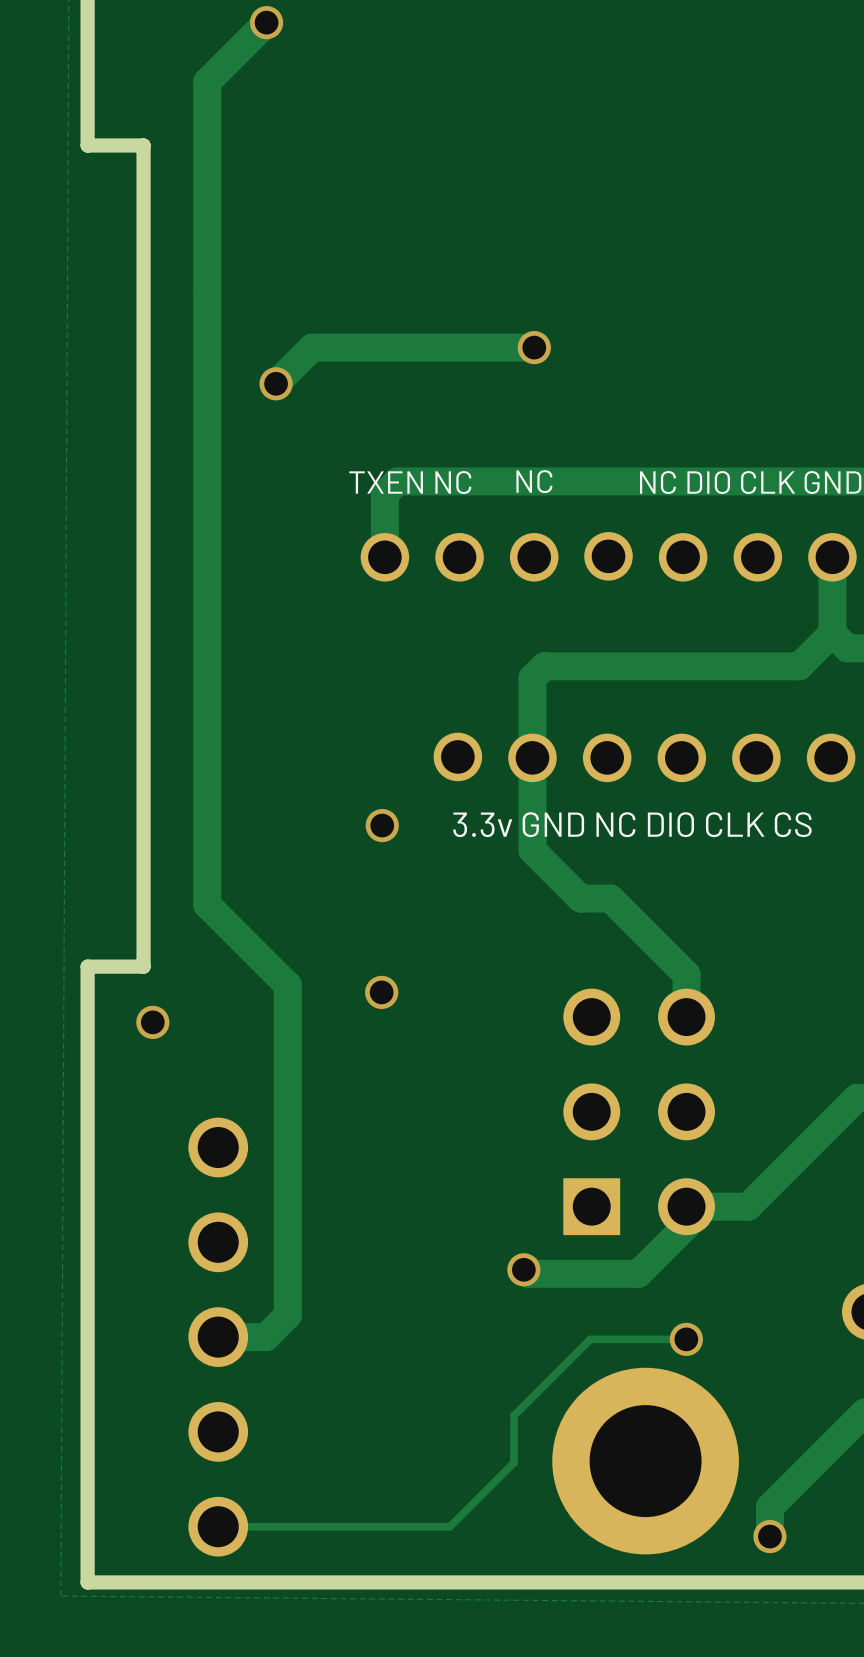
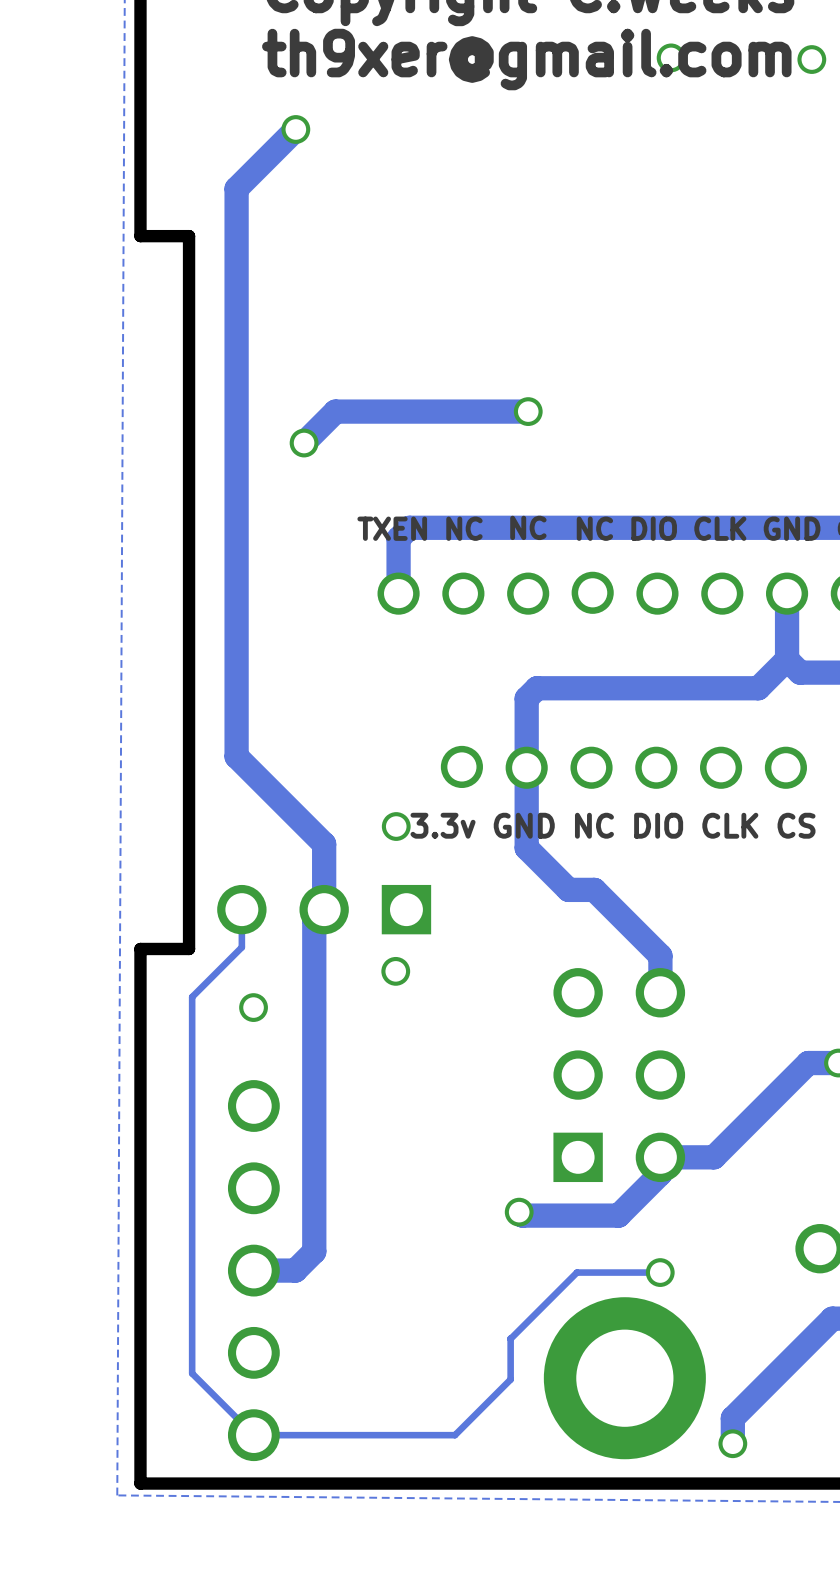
track: (207, 81) (207, 904) (287, 985) -> (244, 181) (236, 188) (236, 756) (324, 844) (324, 909) (314, 919) (314, 965)
track: none -> (241, 909) (241, 947) (192, 997) (192, 1373) (253, 1435)
part: none -> (324, 909)
via position: (152, 1022) -> (253, 1007)

